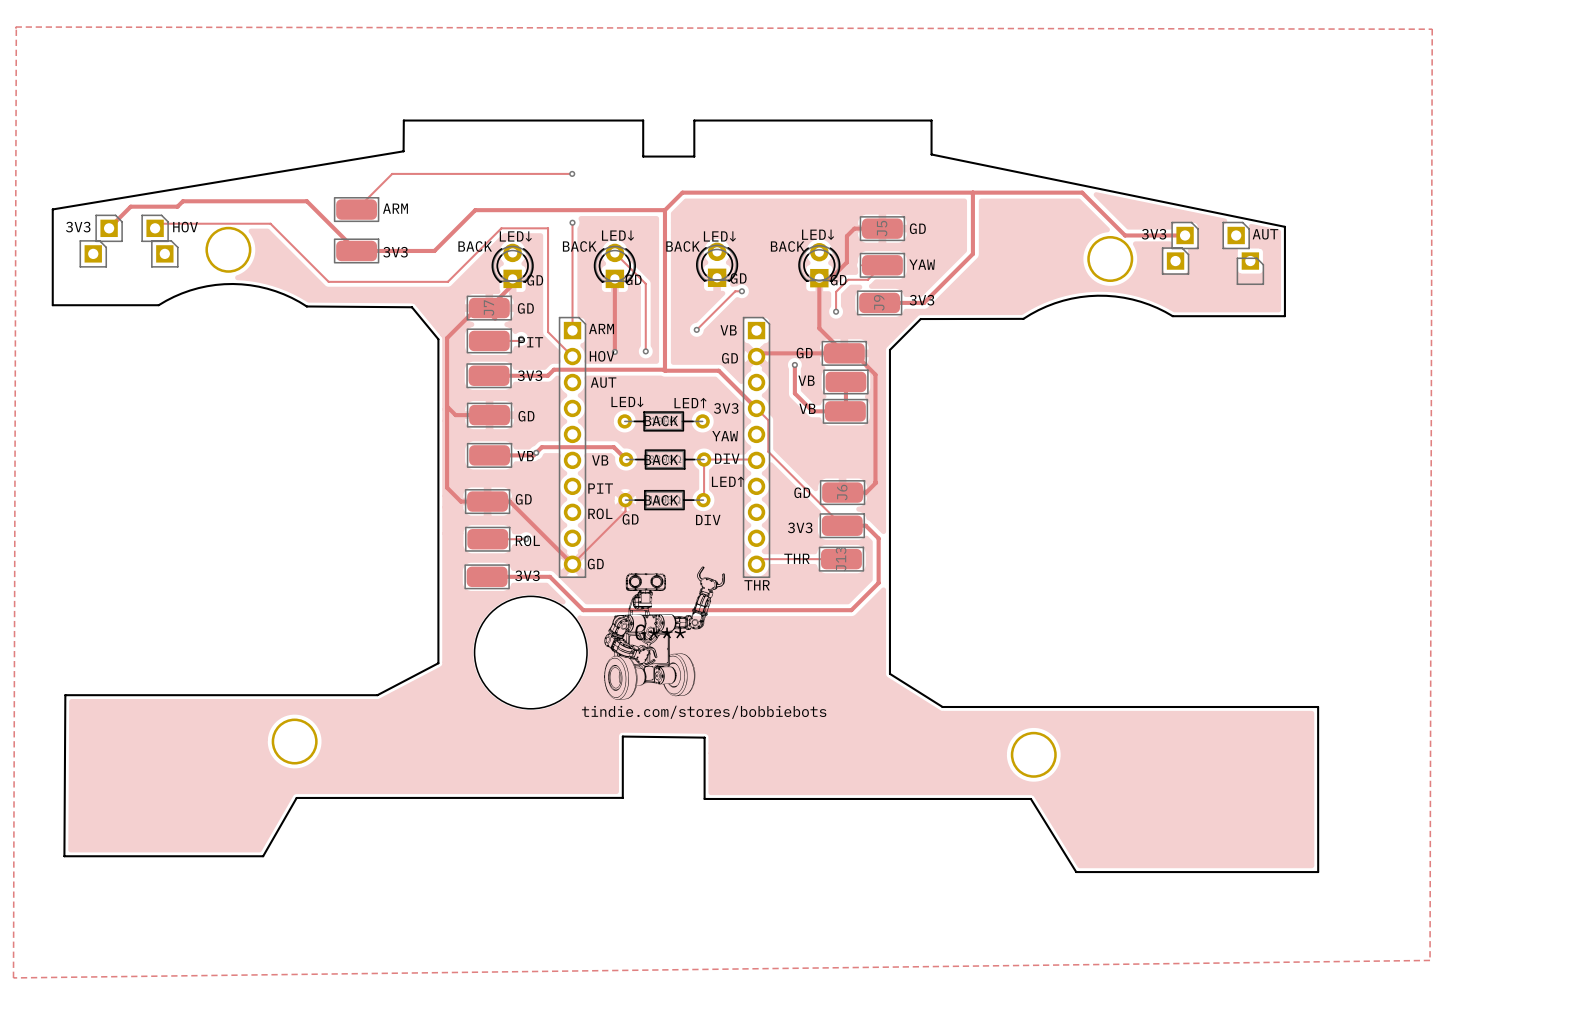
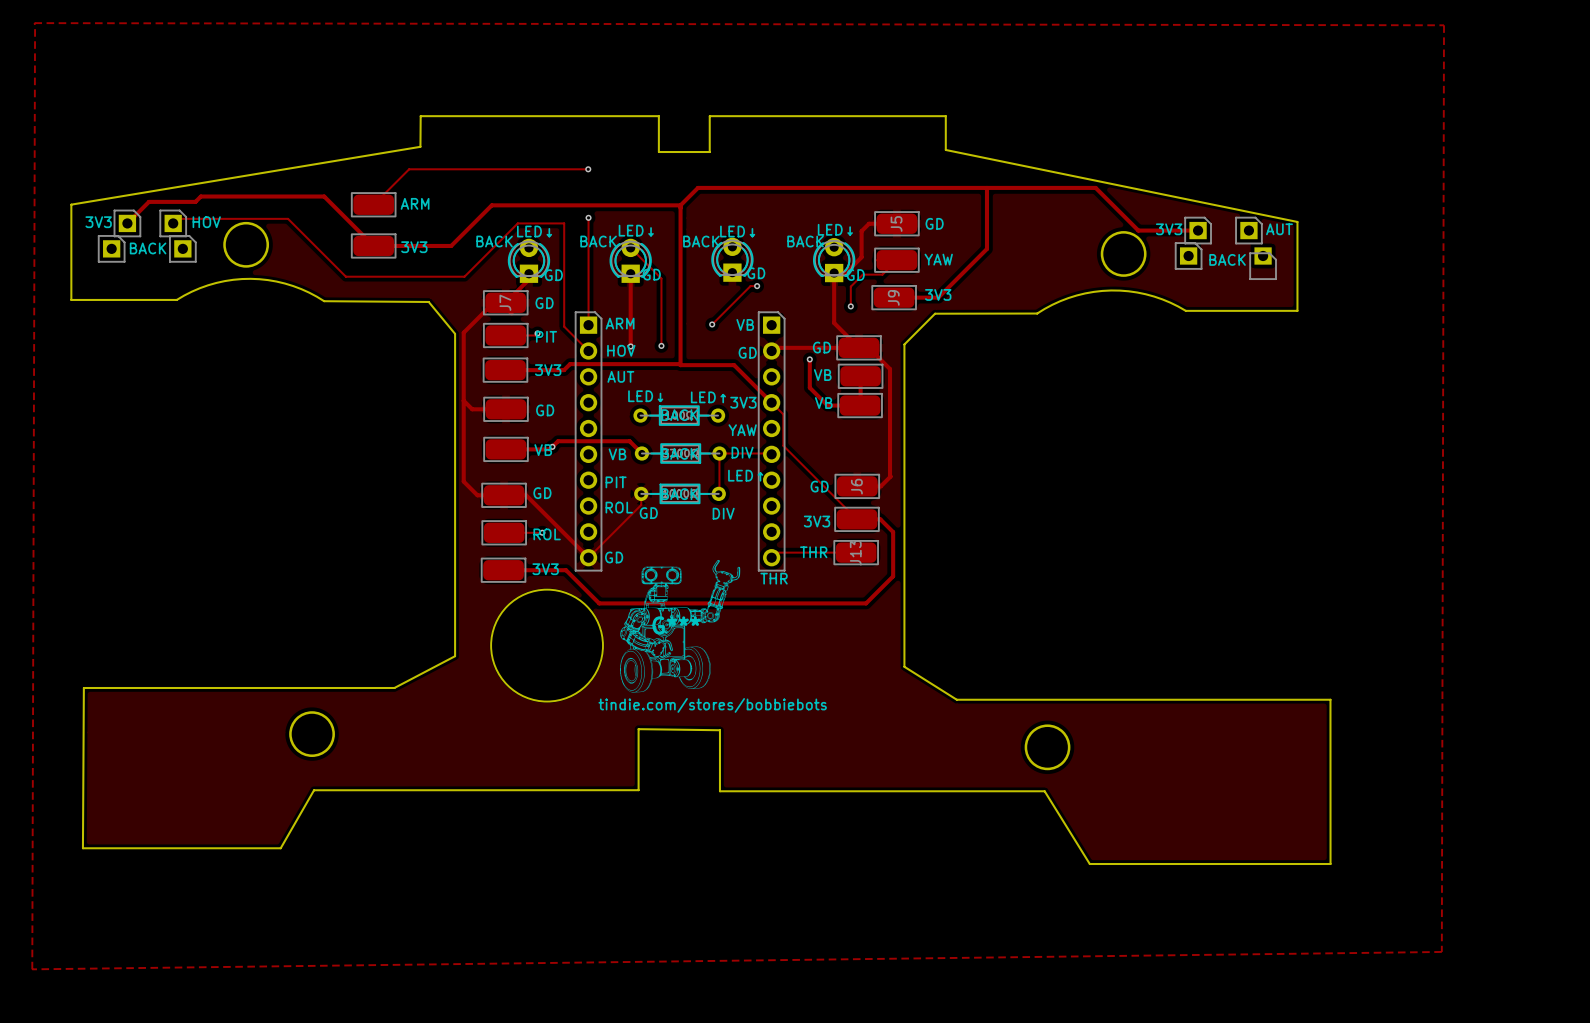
text: none -> BACK (148, 248)
text: none -> BACK (1227, 259)

